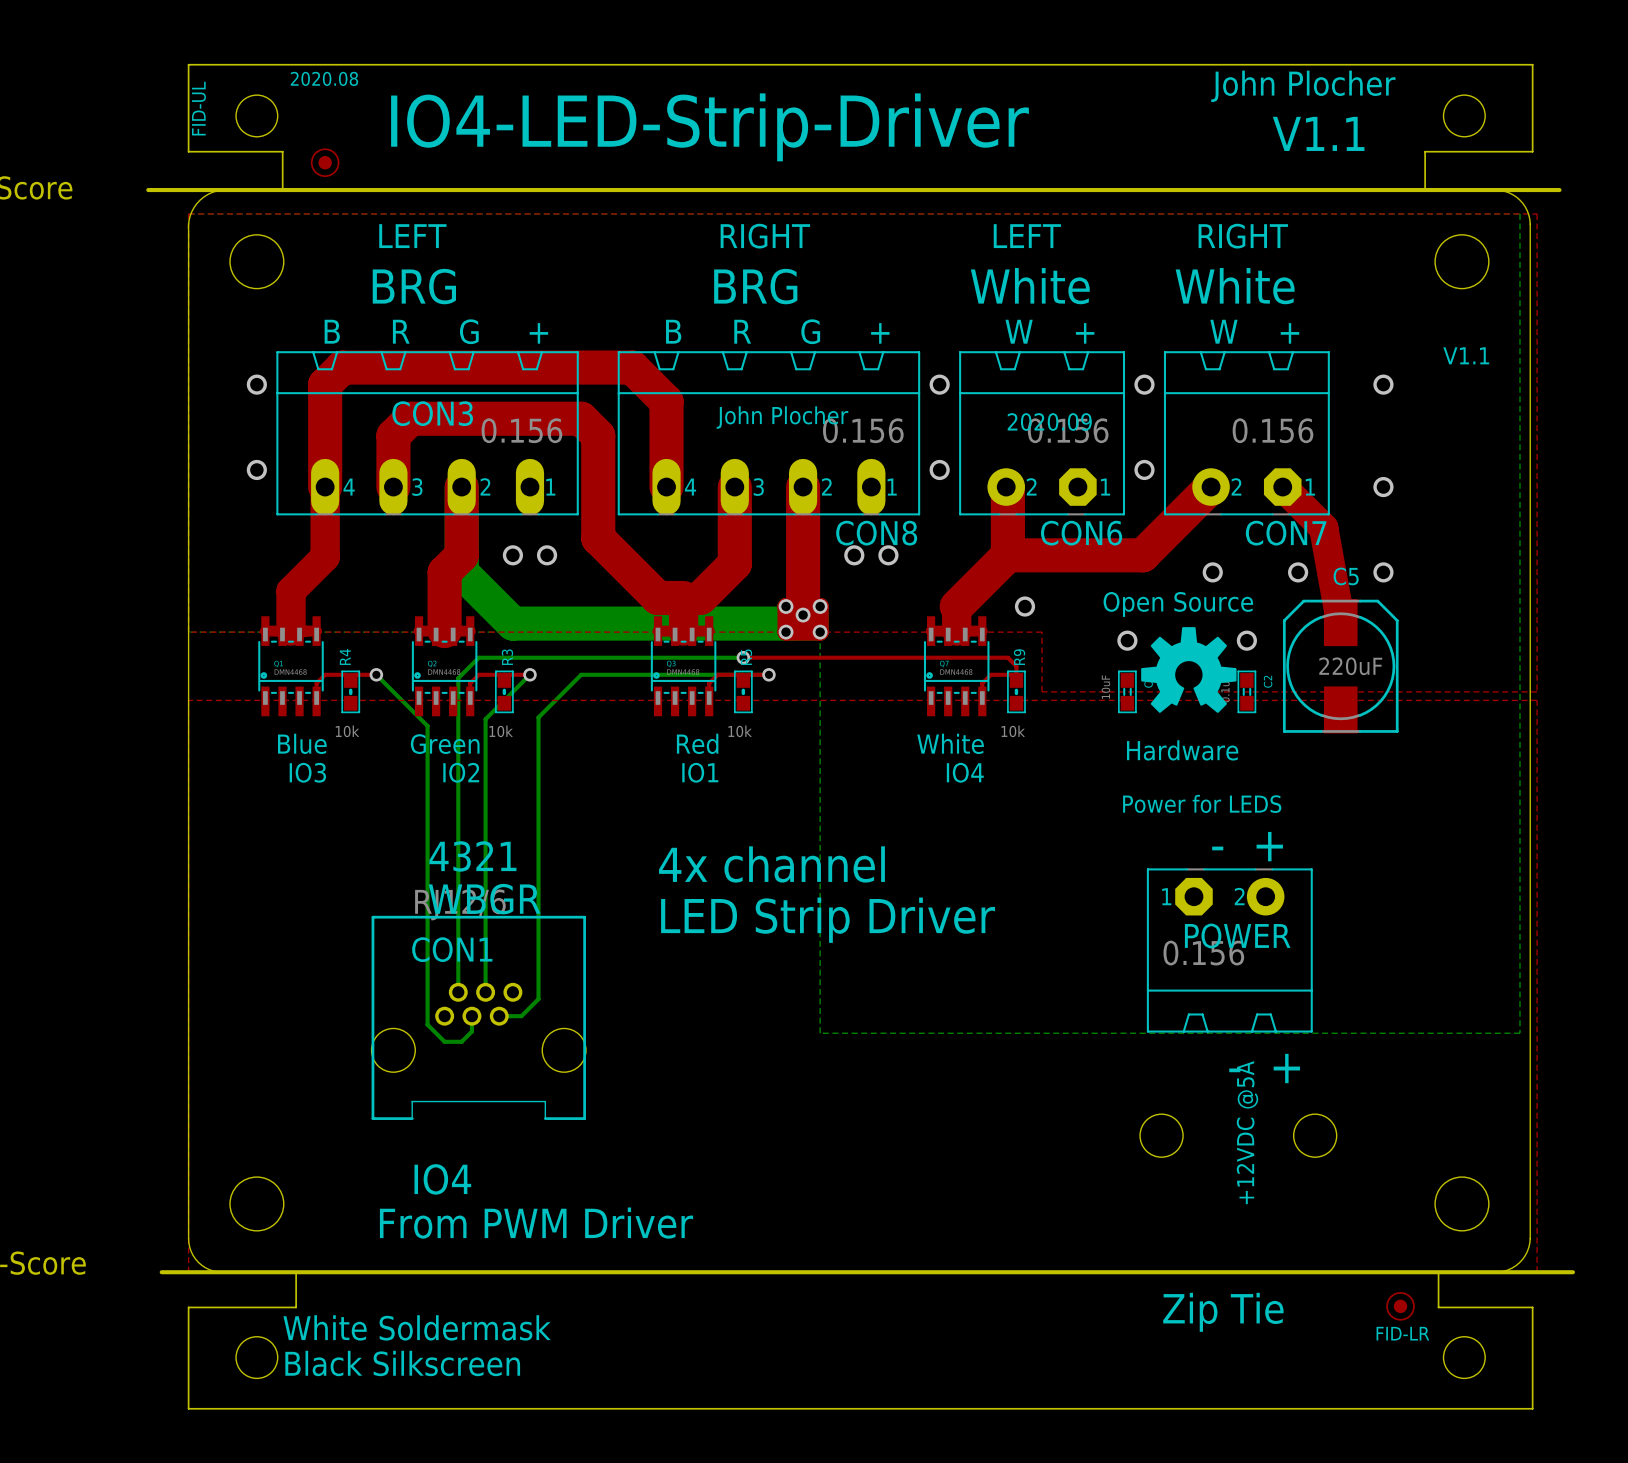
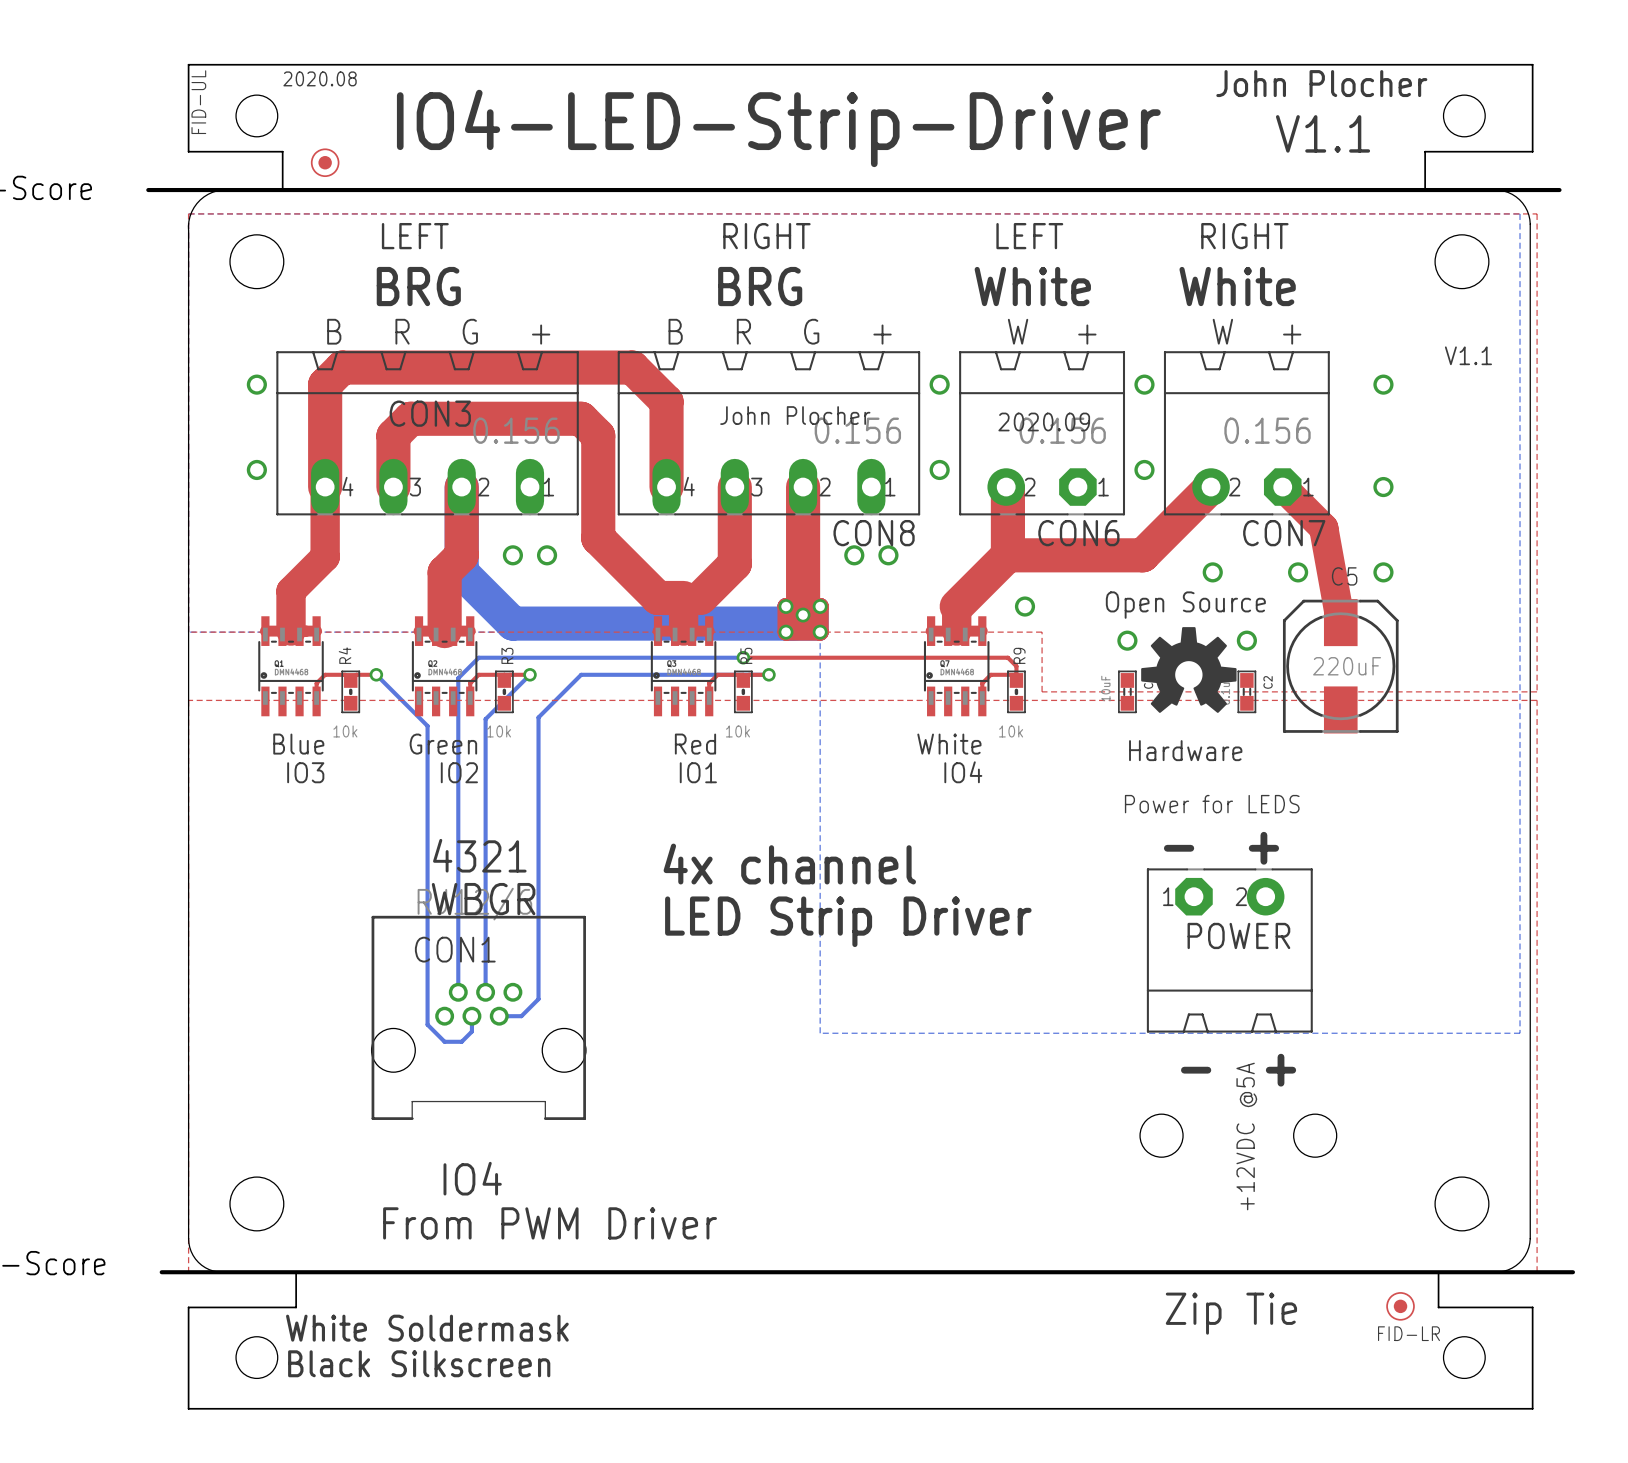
POWER value: 0.156 (1203, 953) -> none

